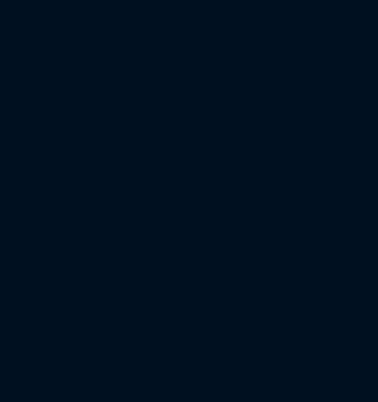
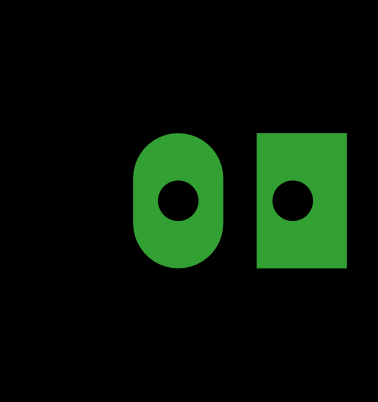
part: none -> (239, 200)

